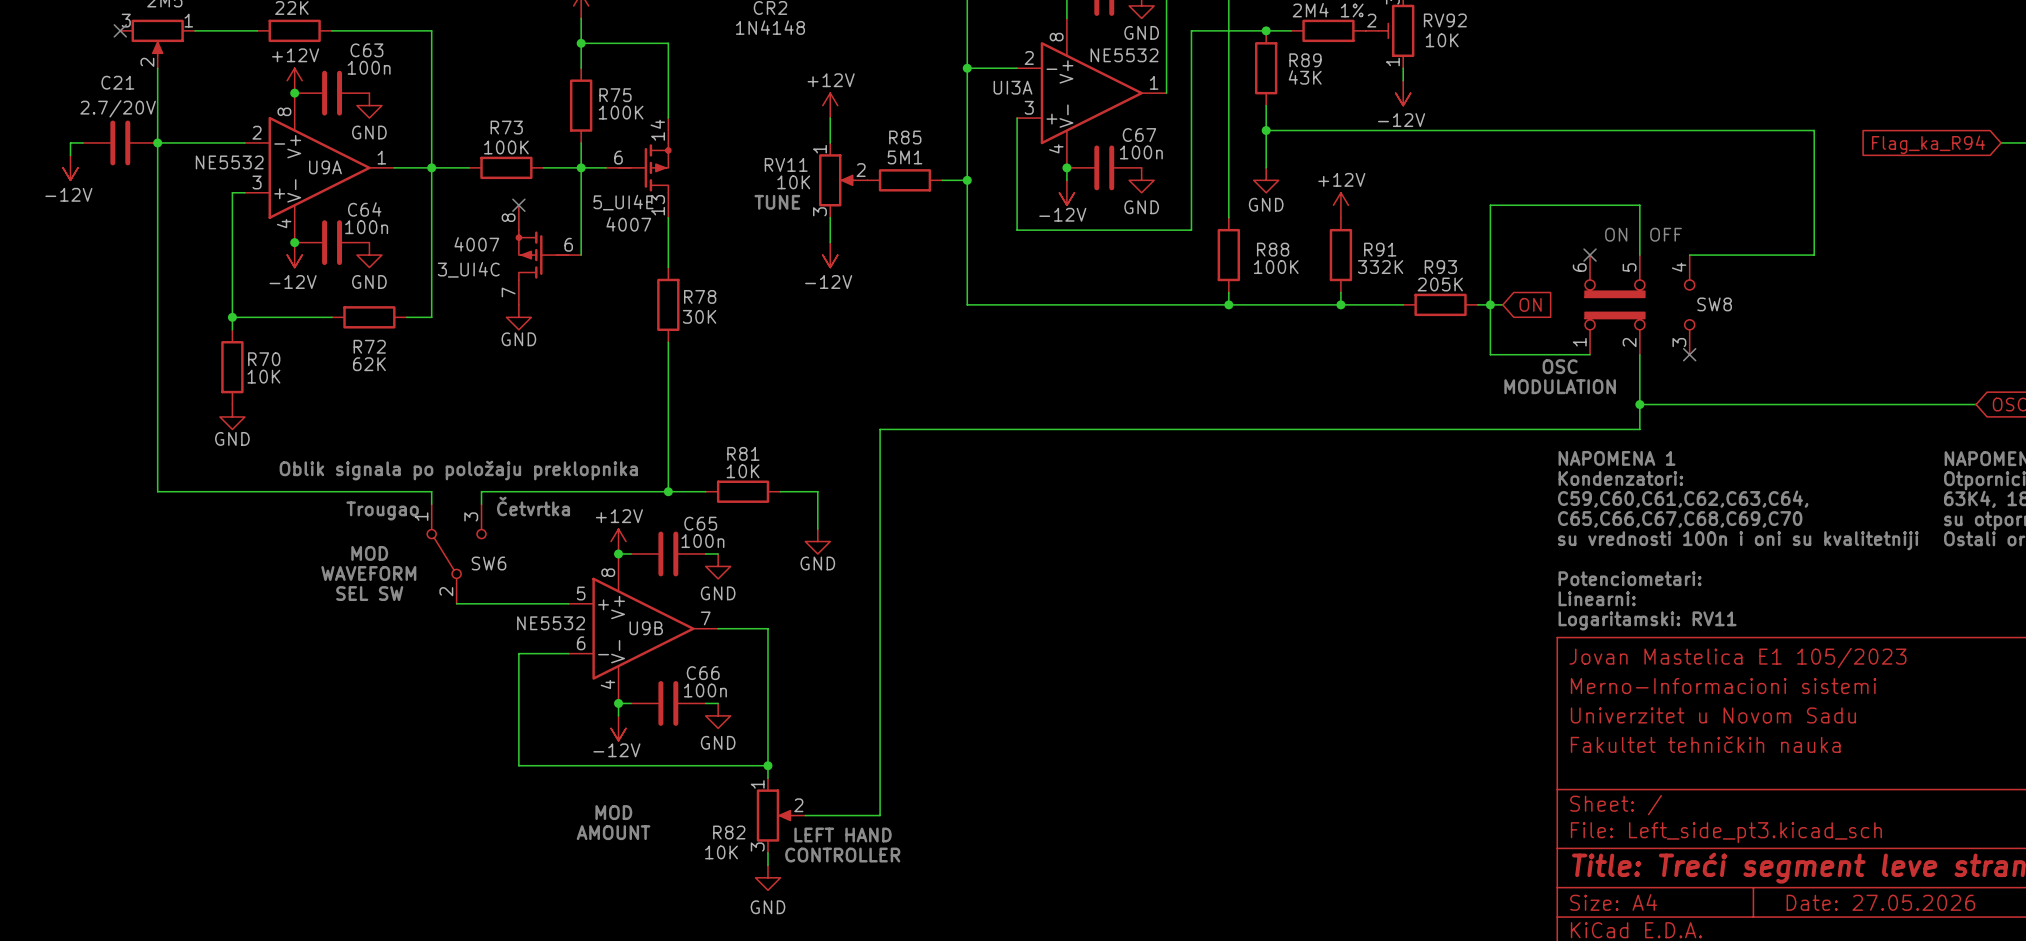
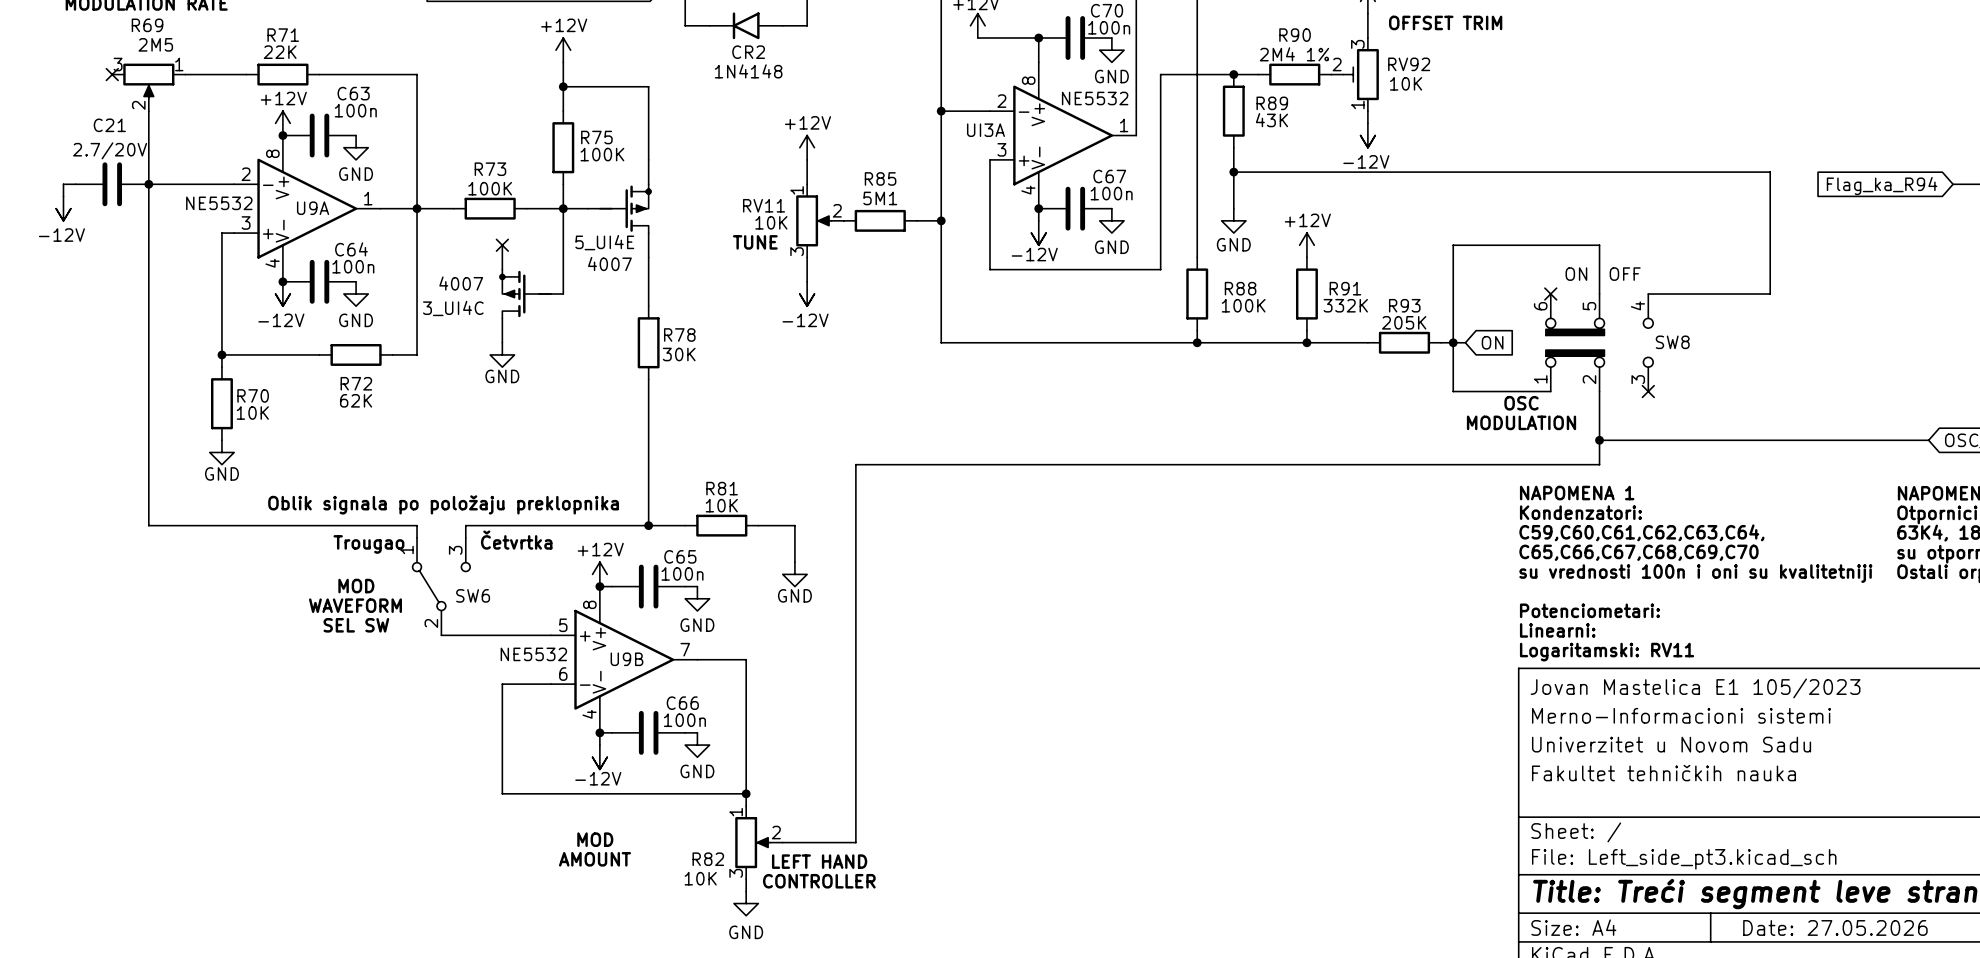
5_UI4E pin number: 14 (657, 130) -> none
5_UI4E pin number: 6 (618, 157) -> none
5_UI4E pin number: 13 (658, 205) -> none
3_UI4C pin number: 8 (508, 217) -> none
3_UI4C pin number: 6 (568, 244) -> none
3_UI4C pin number: 7 (508, 292) -> none

